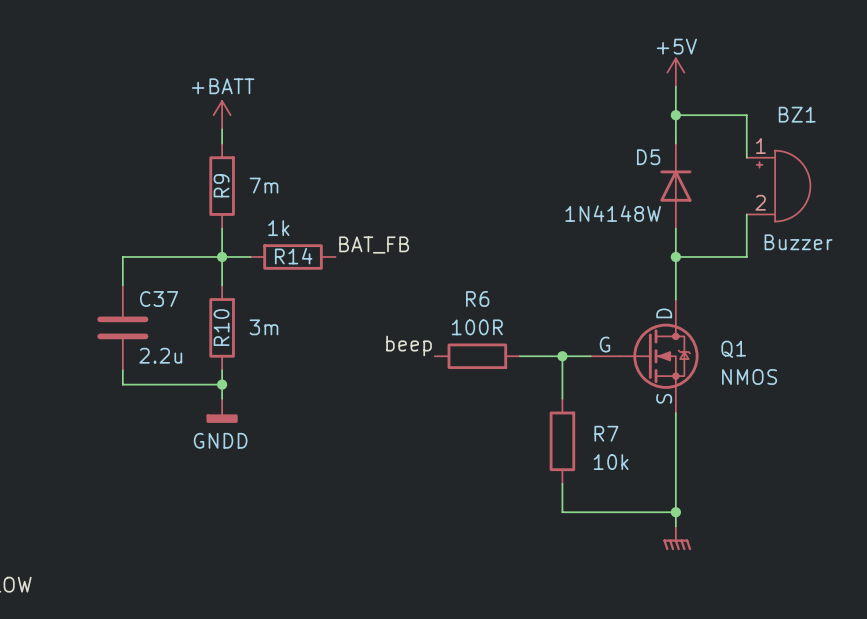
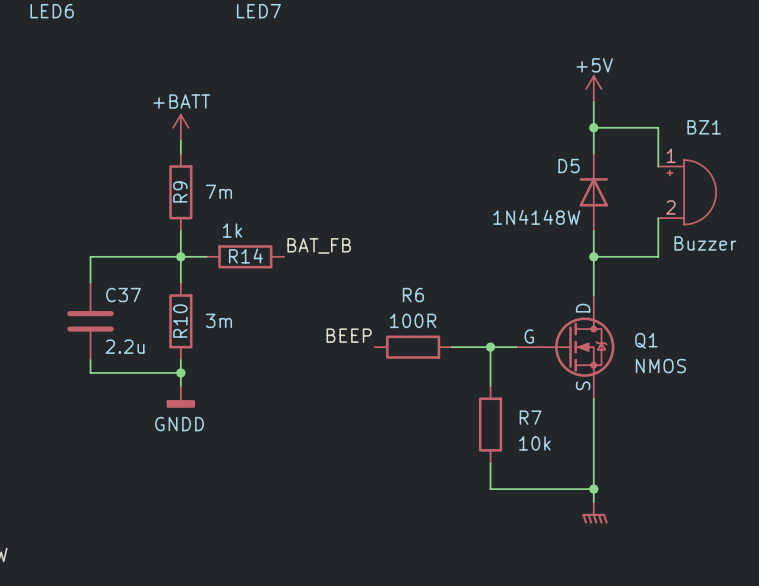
label: beep (409, 345) -> BEEP (349, 335)

